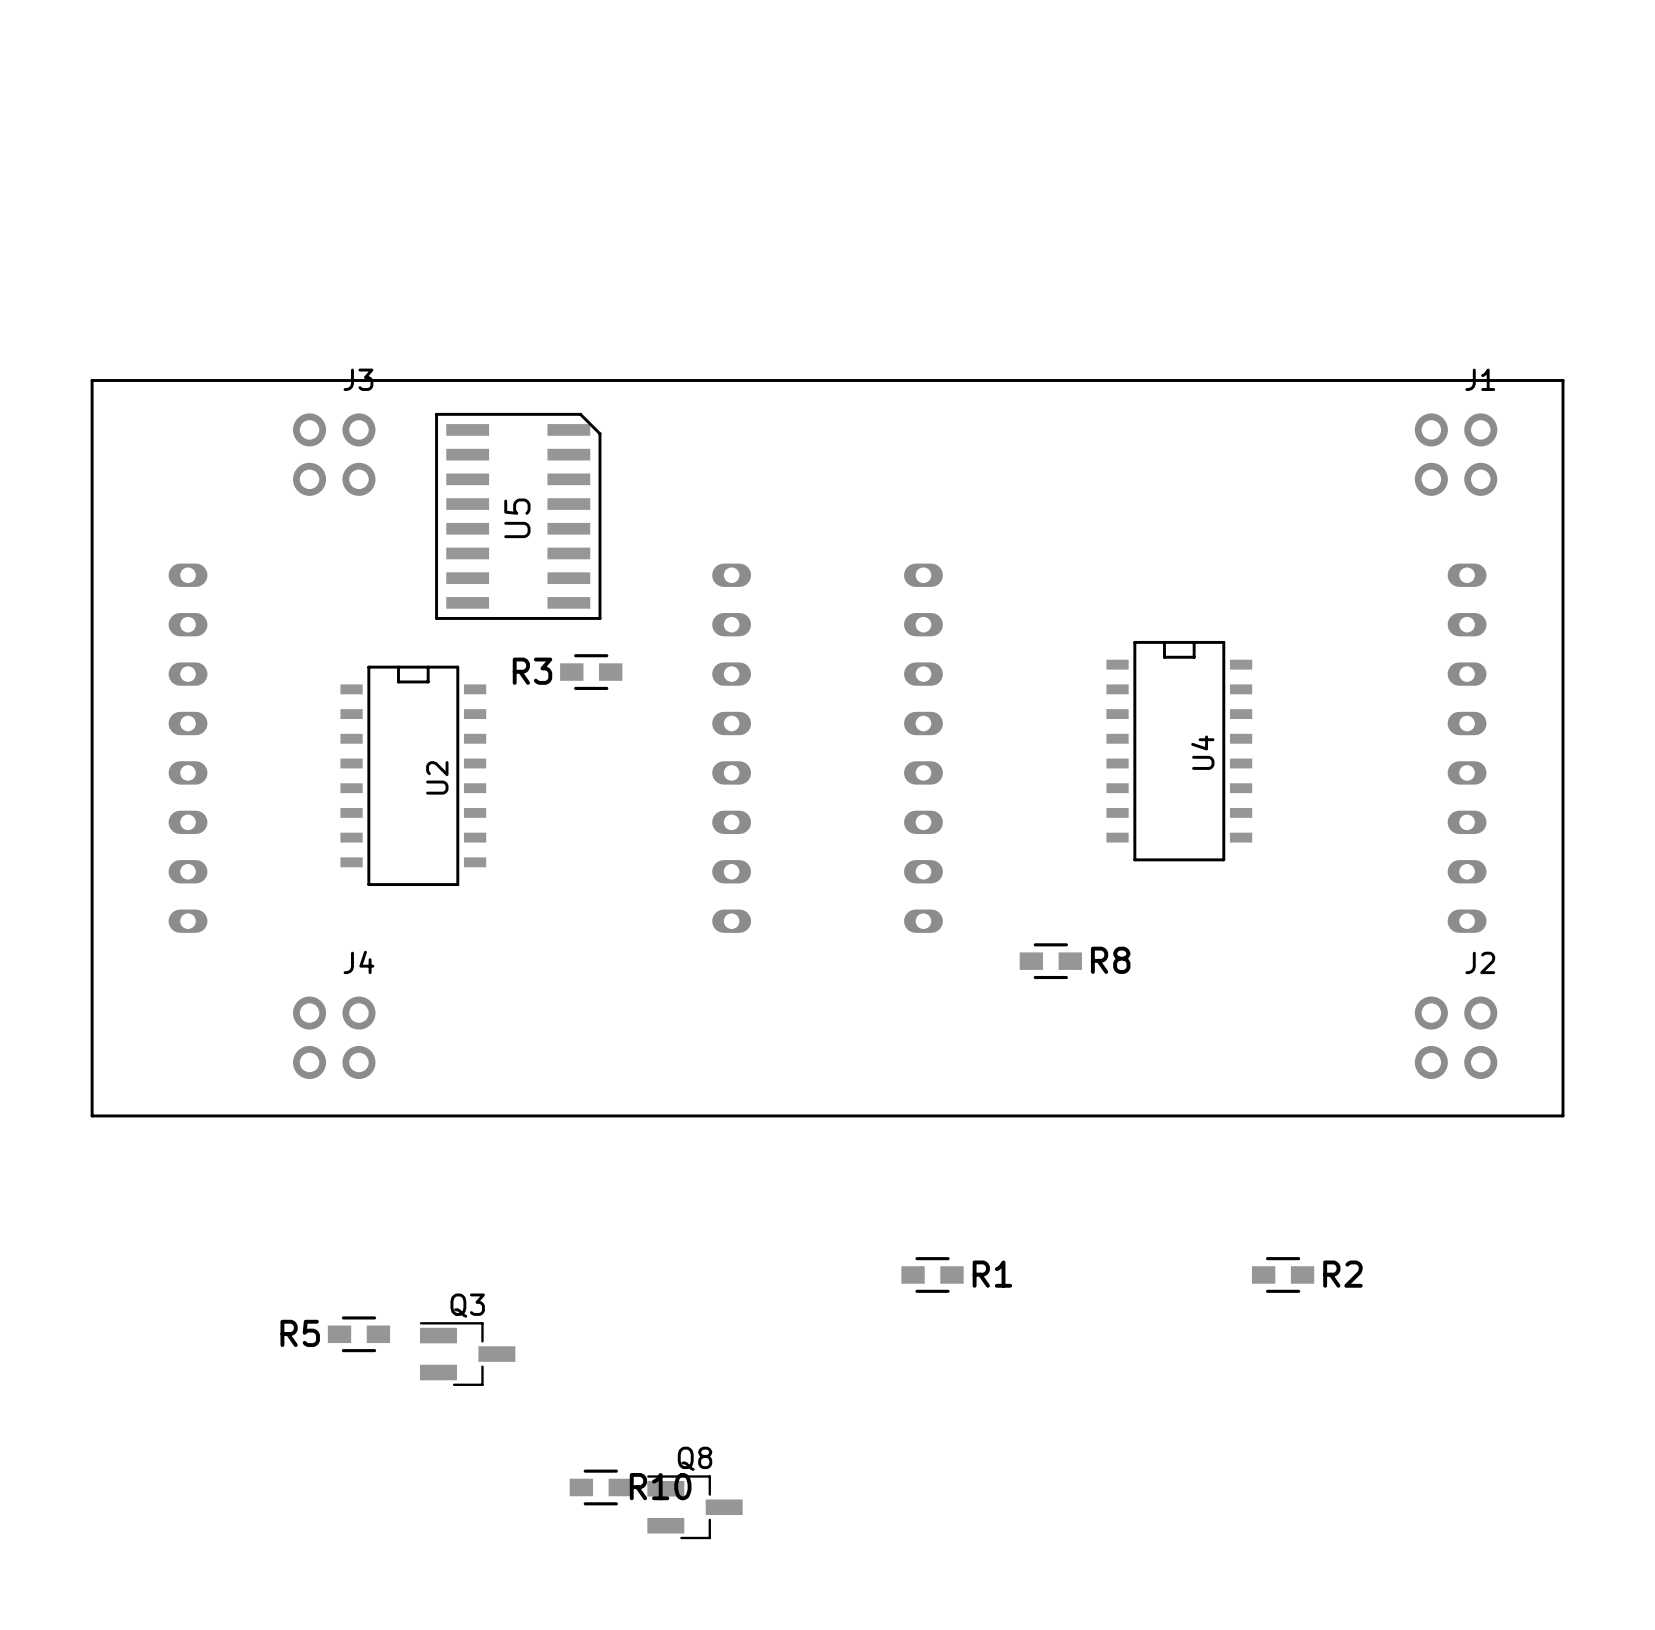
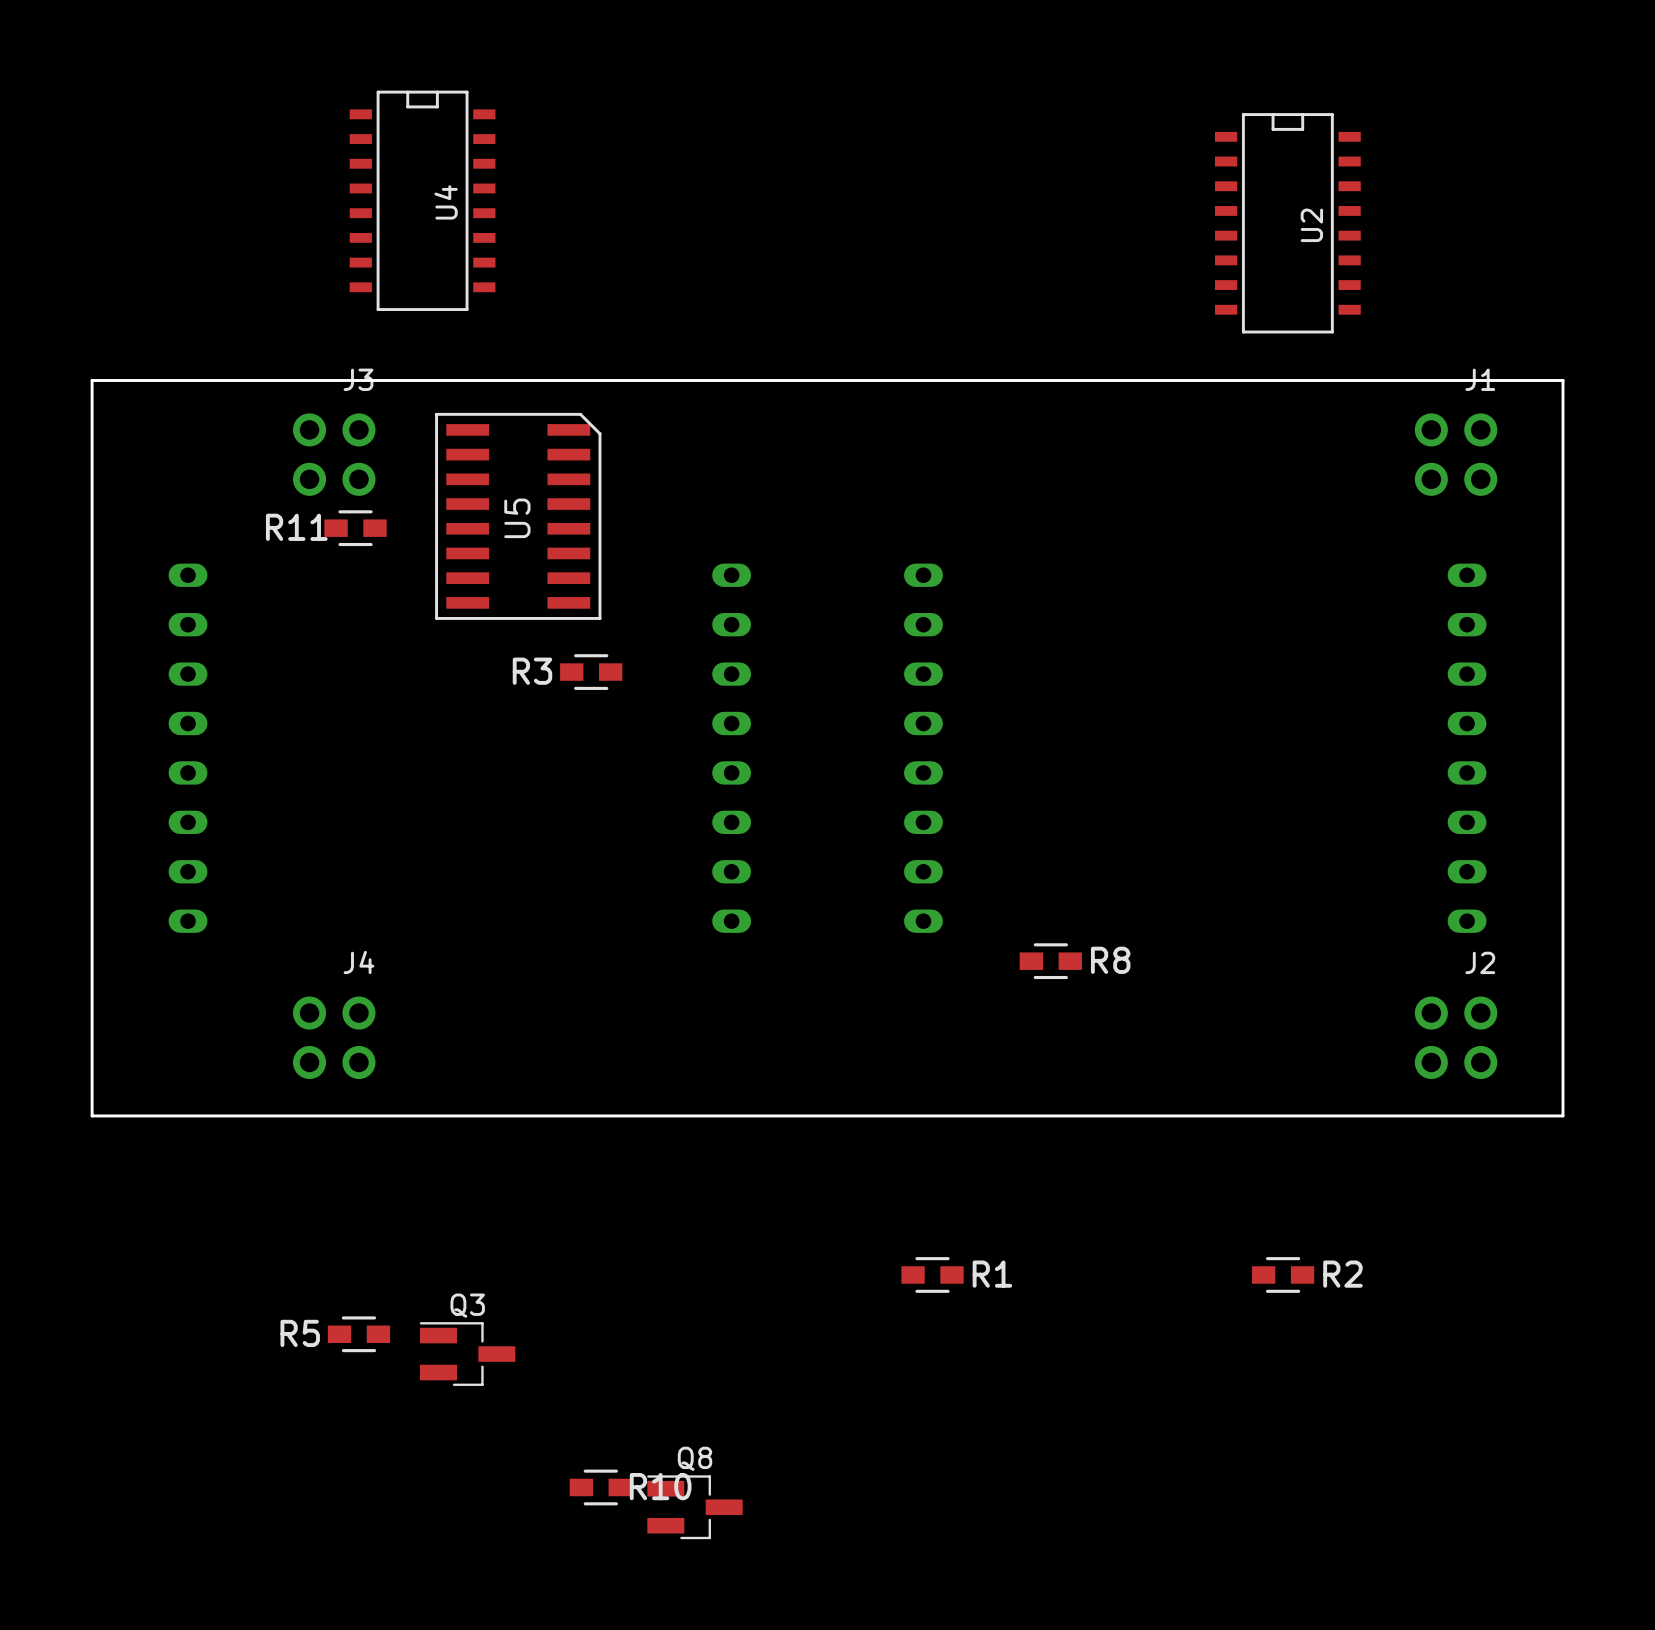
R11: none -> (355, 528)
U4 position: (1179, 751) -> (422, 200)
U2 position: (413, 775) -> (1287, 223)

